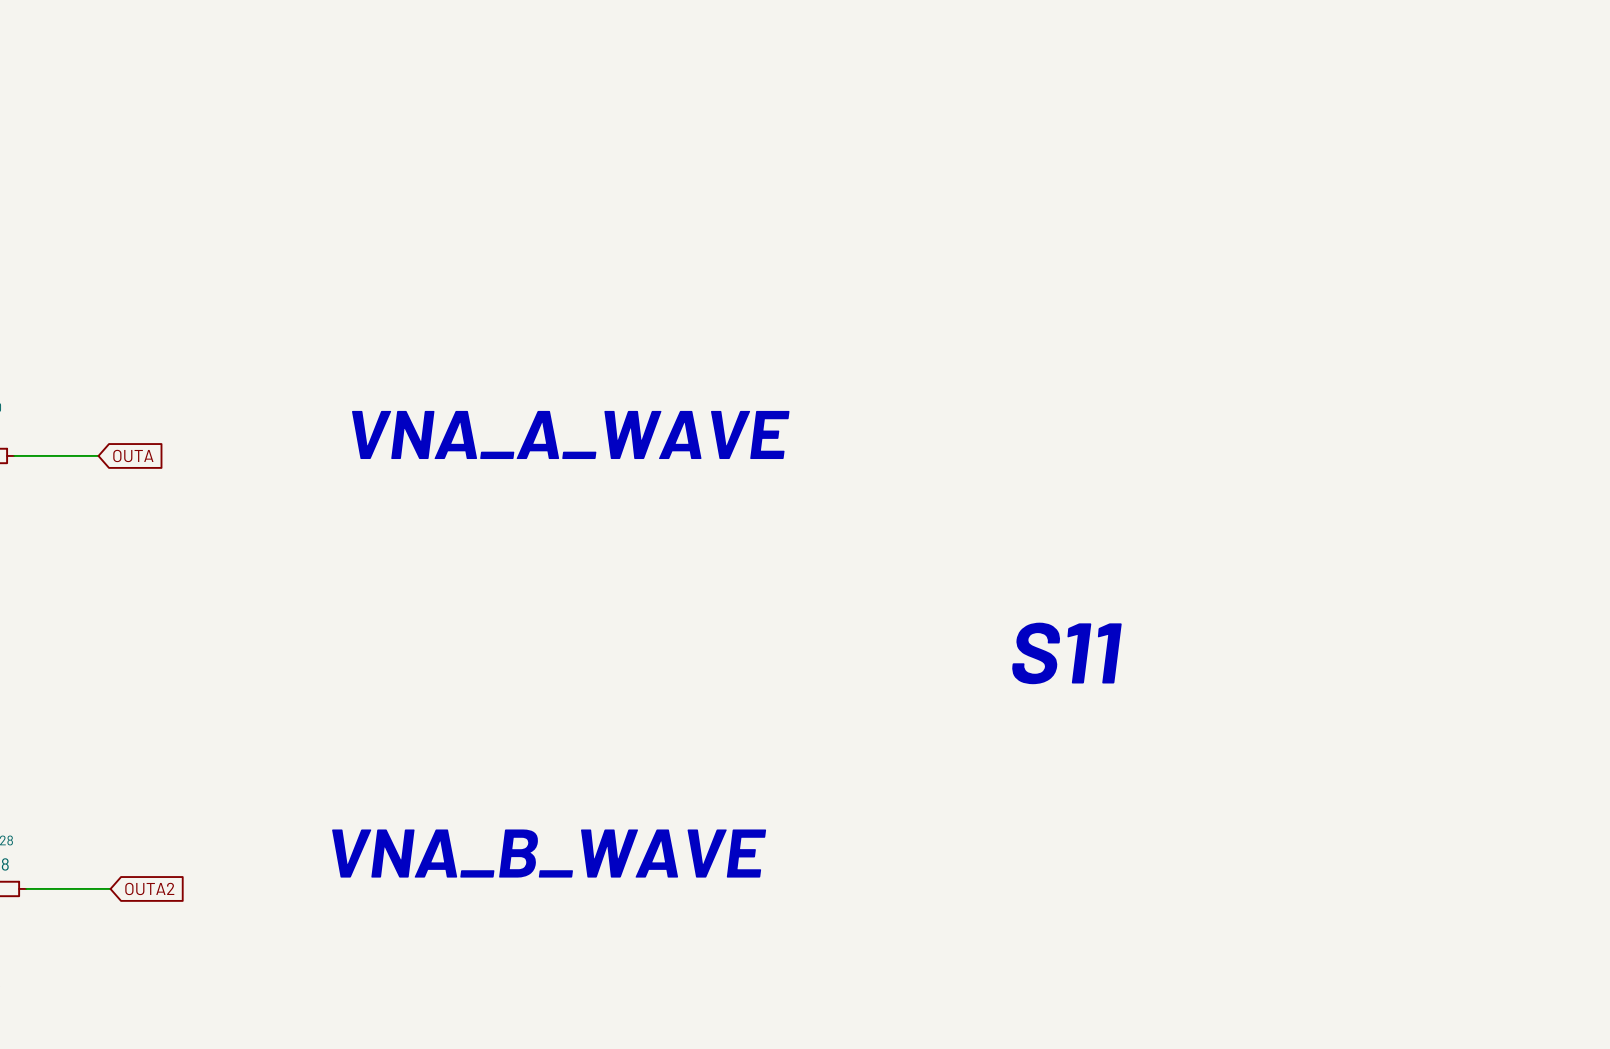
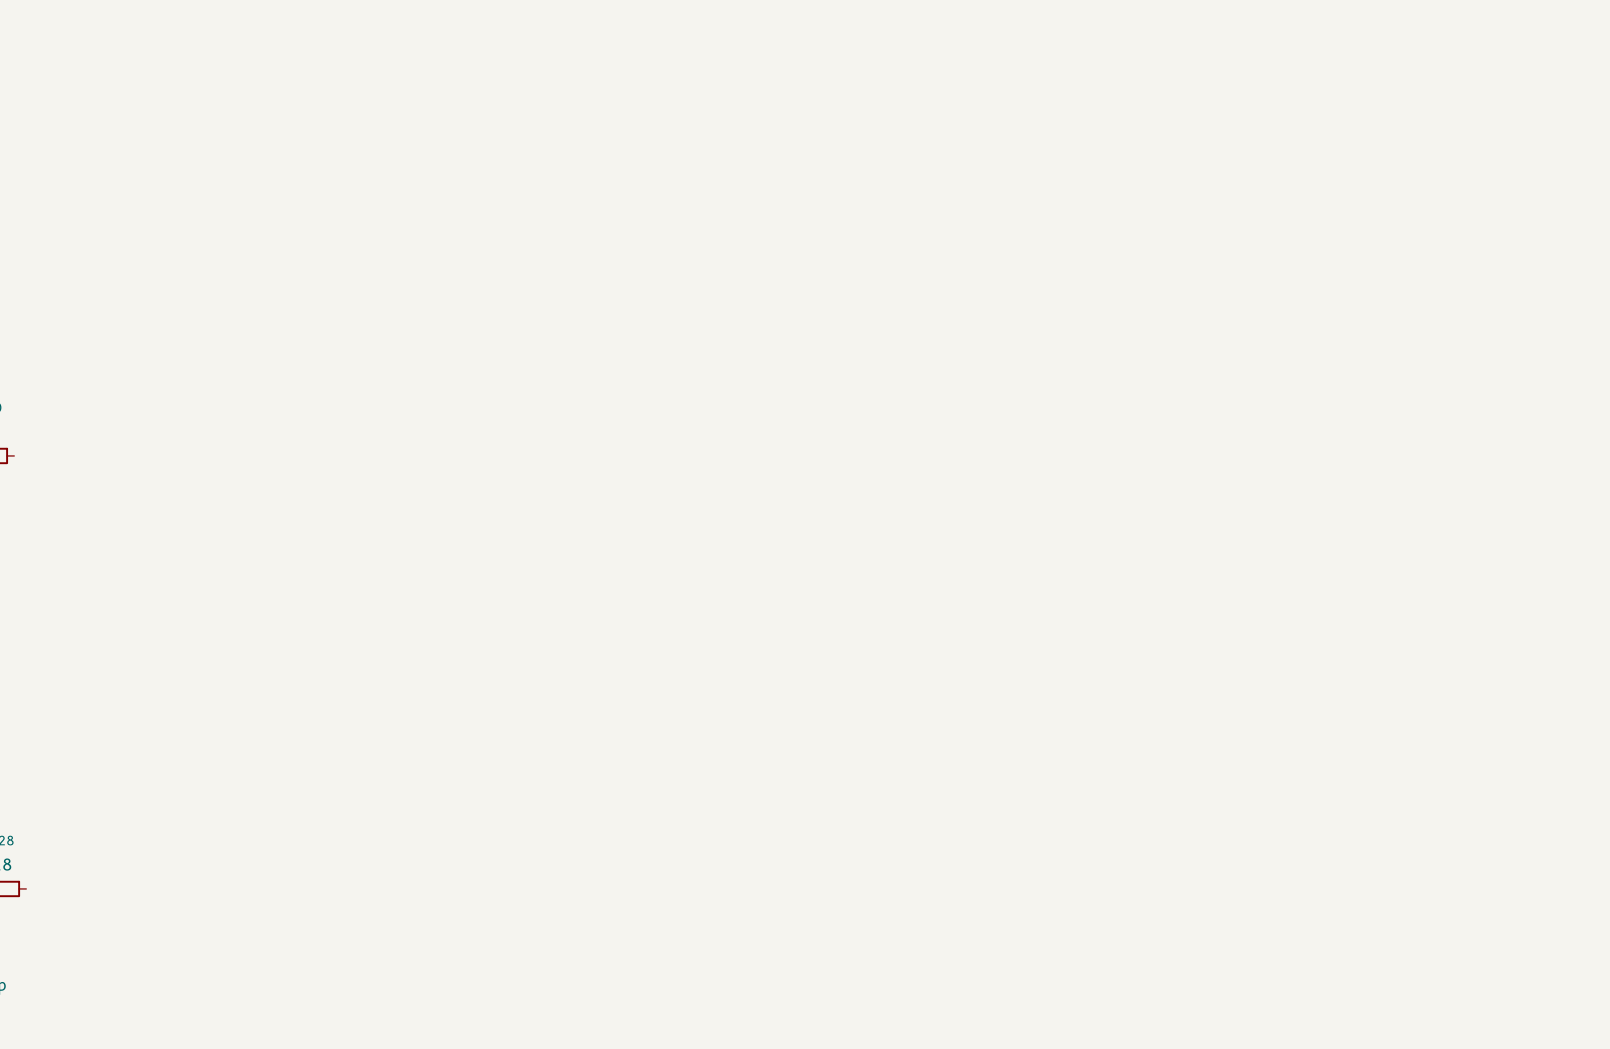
text: VNA_A_WAVE (570, 434) -> none
wire: (14, 455) (98, 455) -> none
global label: OUTA (133, 455) -> none
text: S11 (1066, 653) -> none
text: VNA_B_WAVE (549, 853) -> none
wire: (26, 888) (110, 888) -> none
global label: OUTA2 (149, 888) -> none

